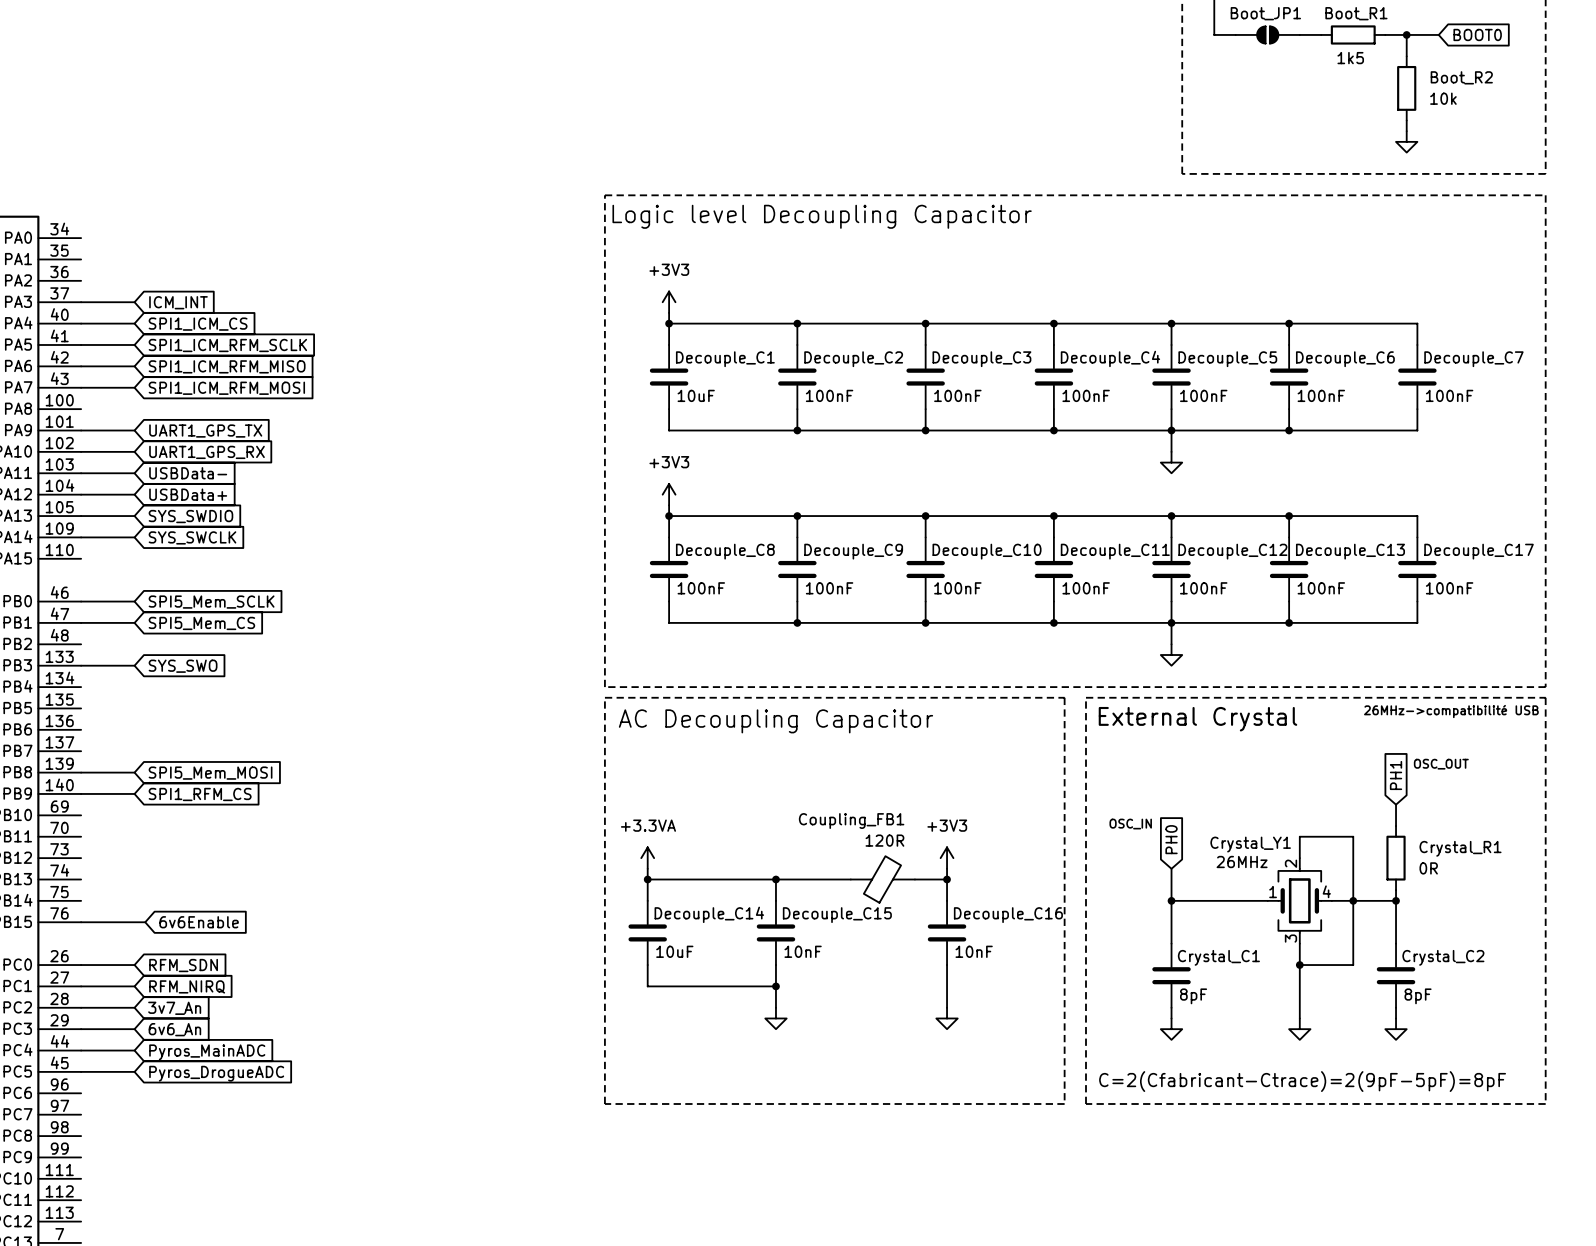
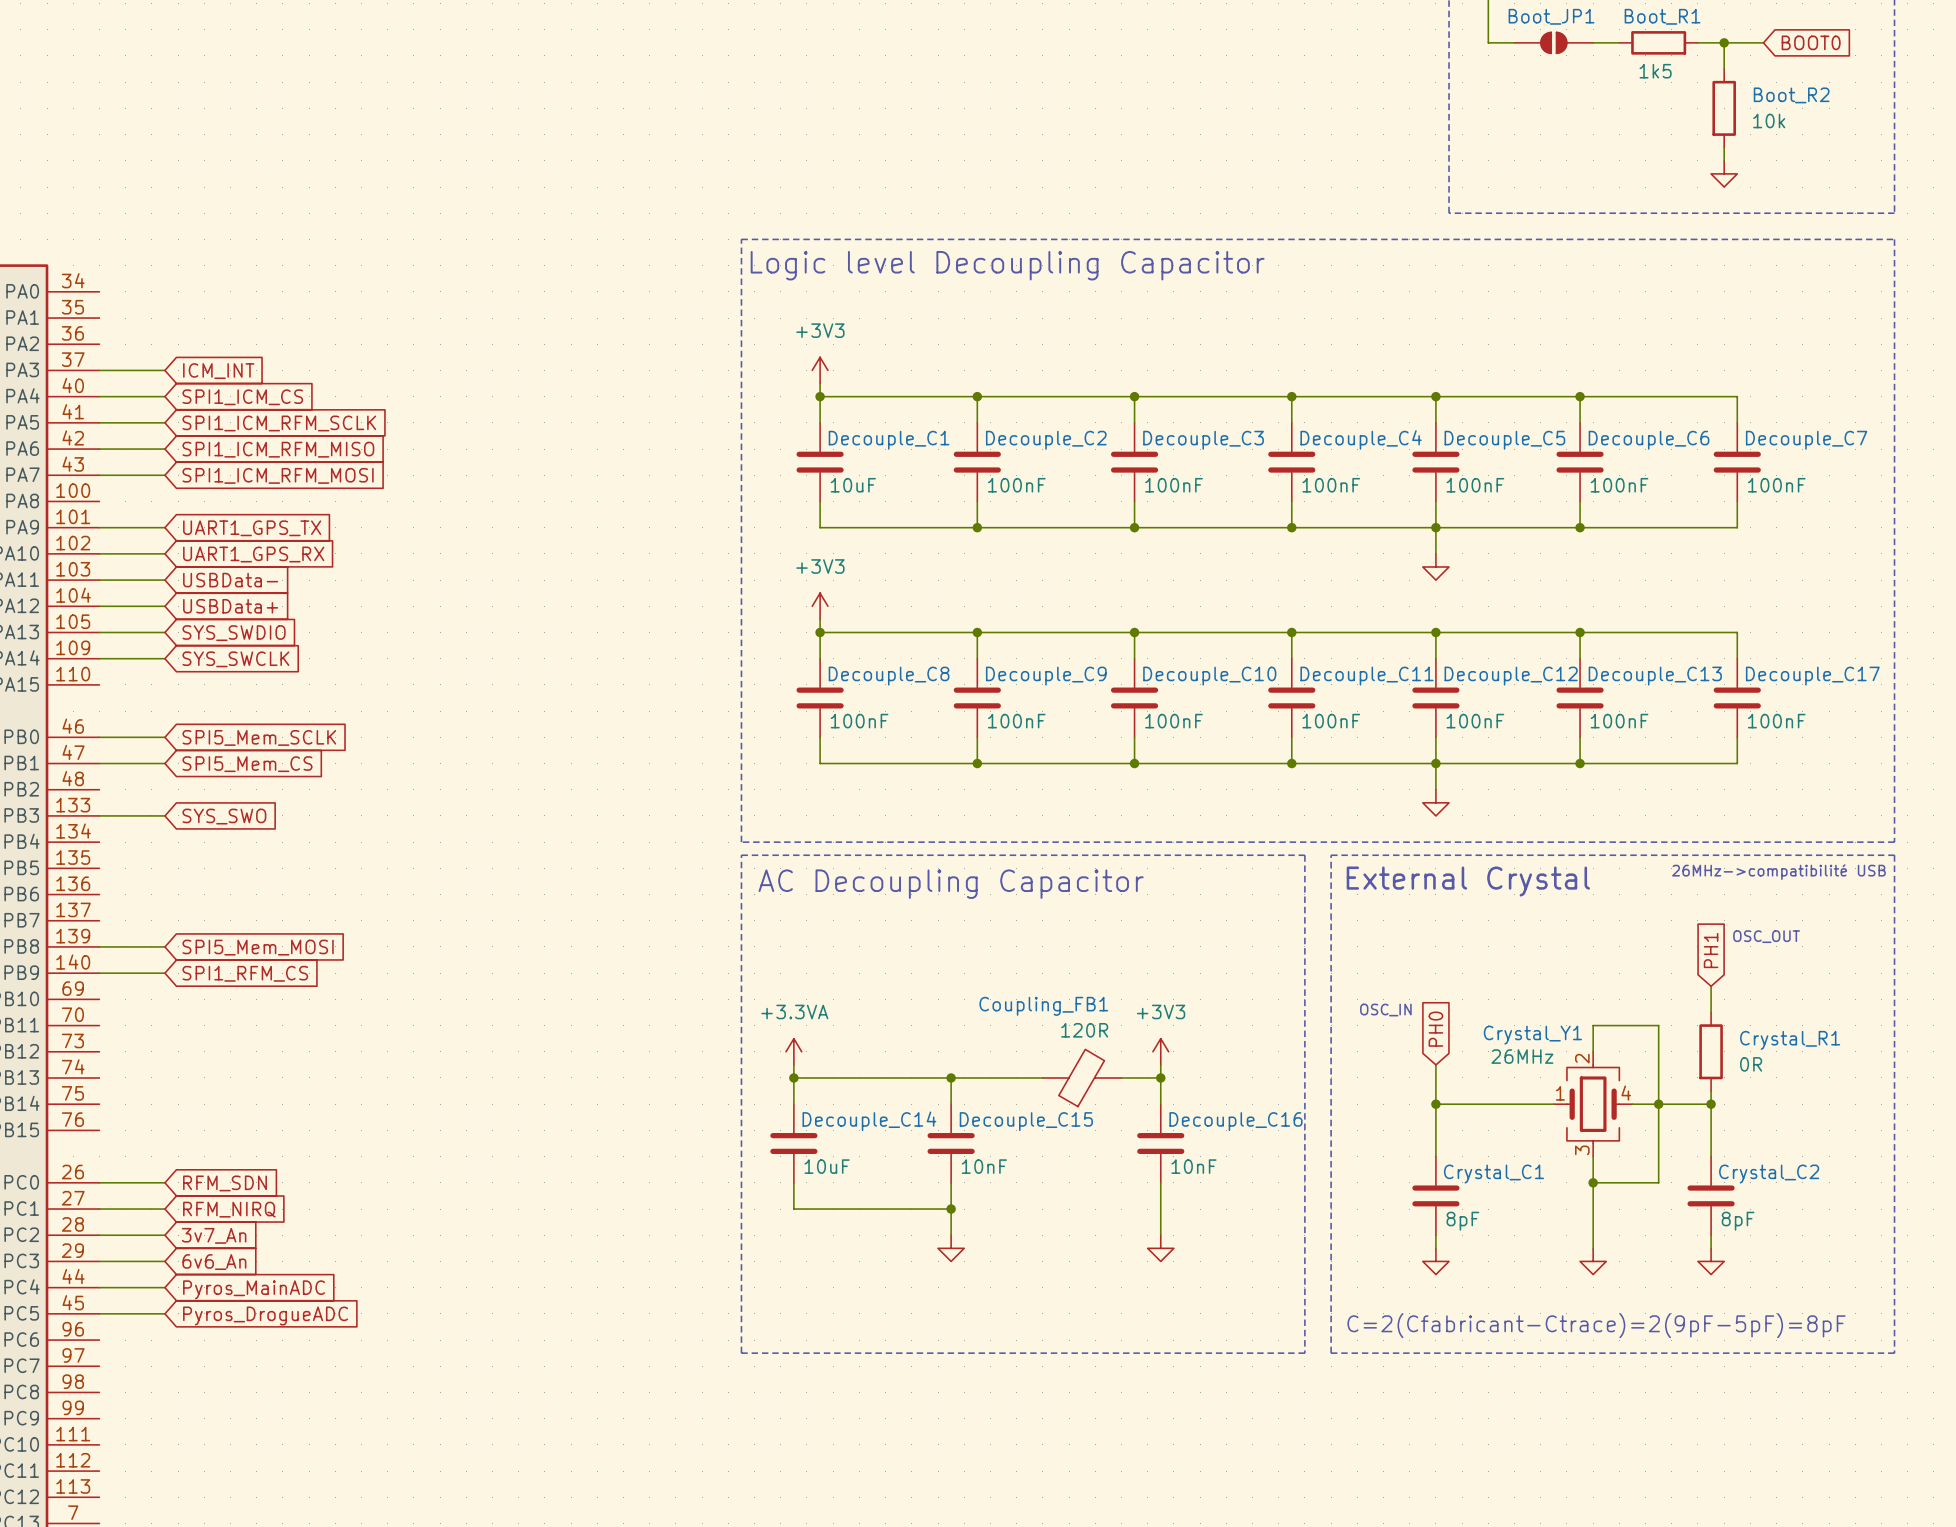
wire: (81, 922) (145, 922) -> none
global label: 6v6Enable (199, 922) -> none

